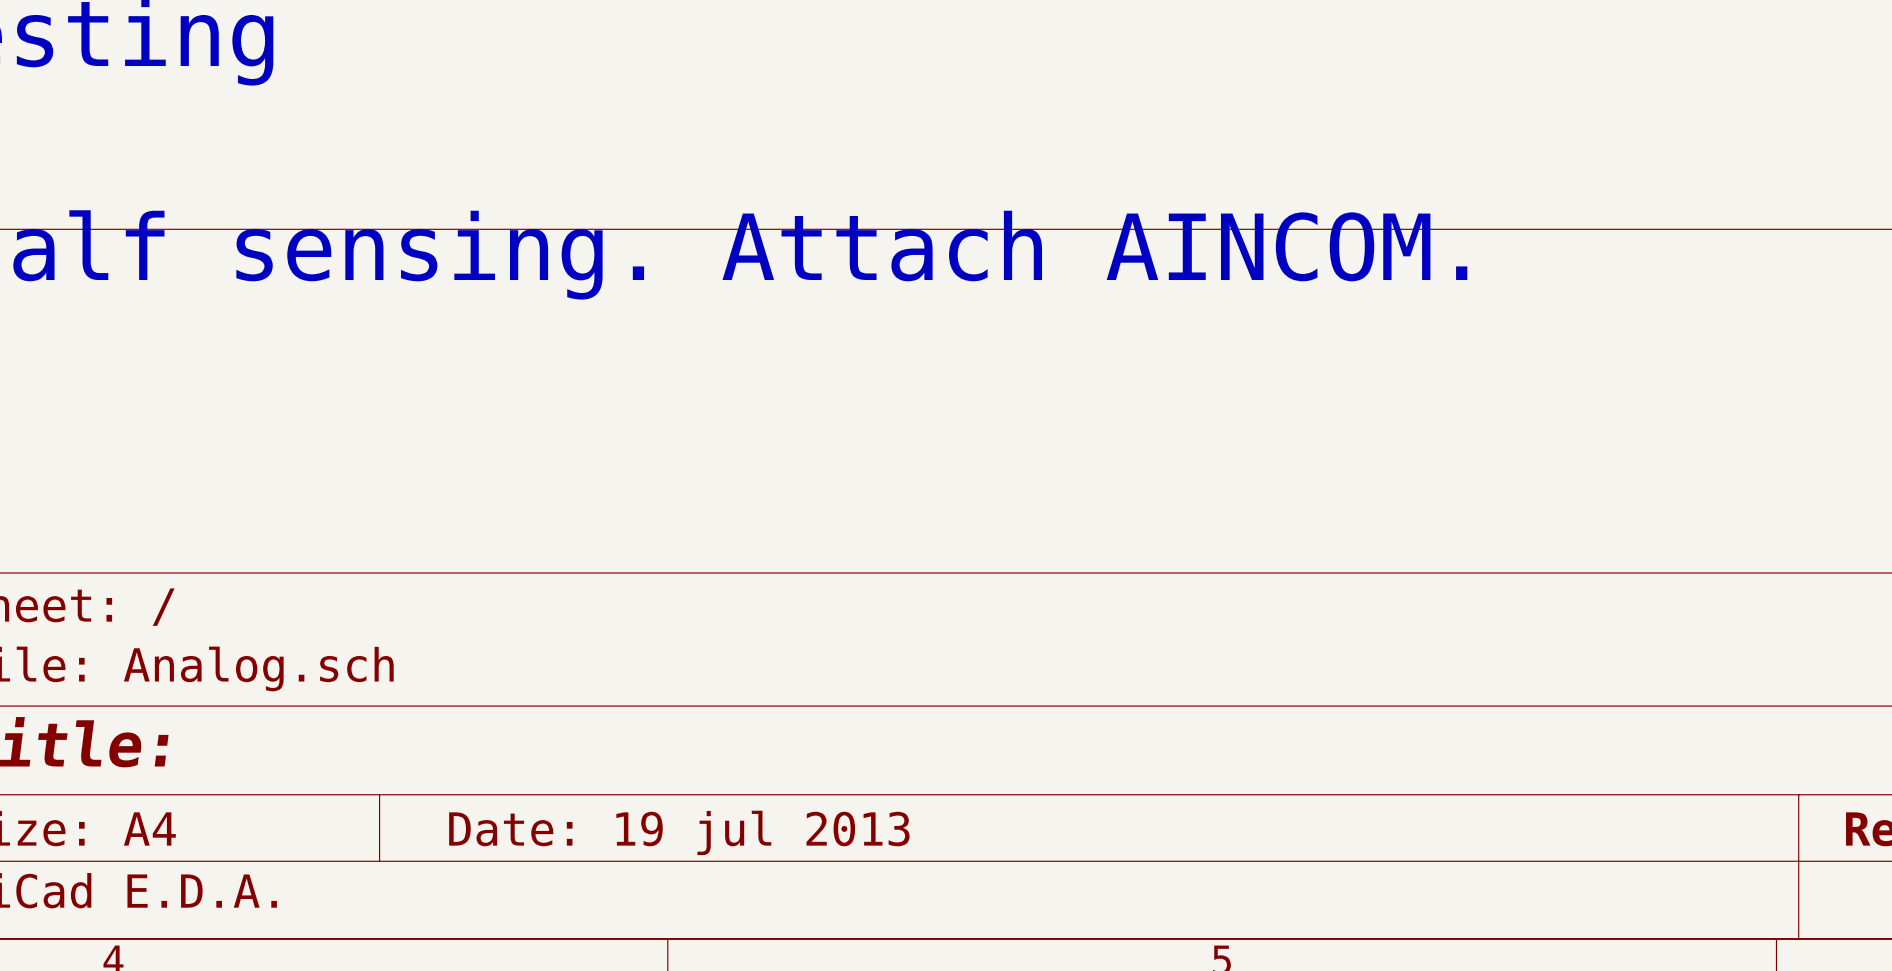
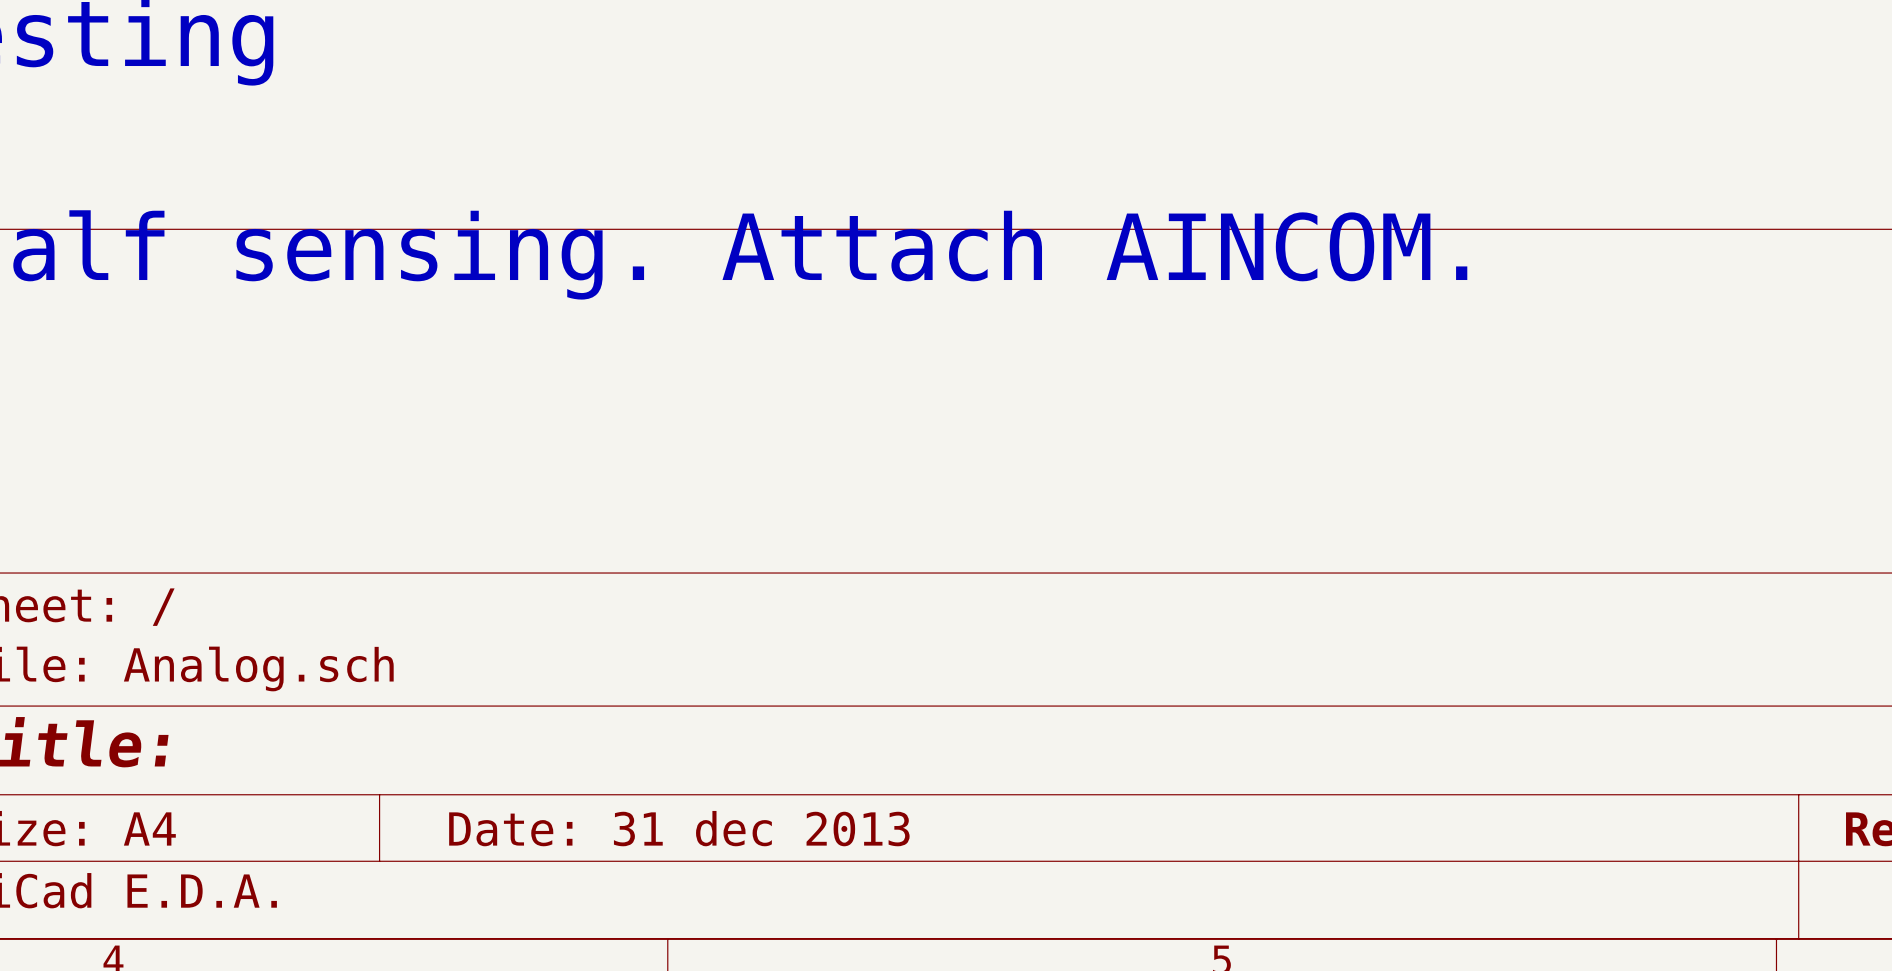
title block: Date: 19 jul 2013 (679, 832) -> Date: 31 dec 2013 (679, 828)

